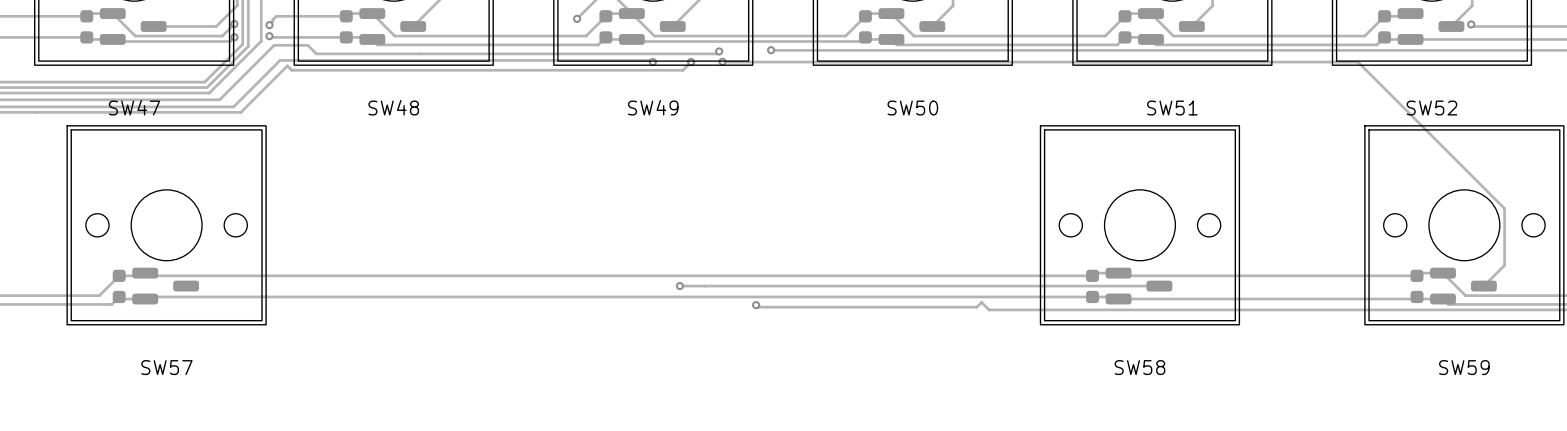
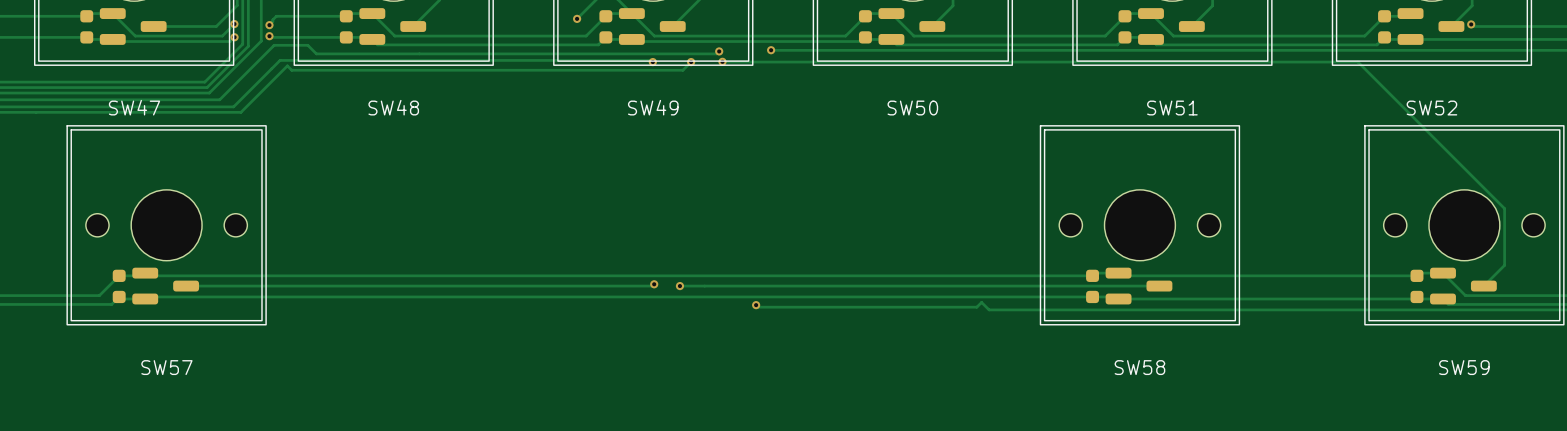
track: none -> (654, 284) (652, 286) (186, 286)
via: none -> (654, 284)

